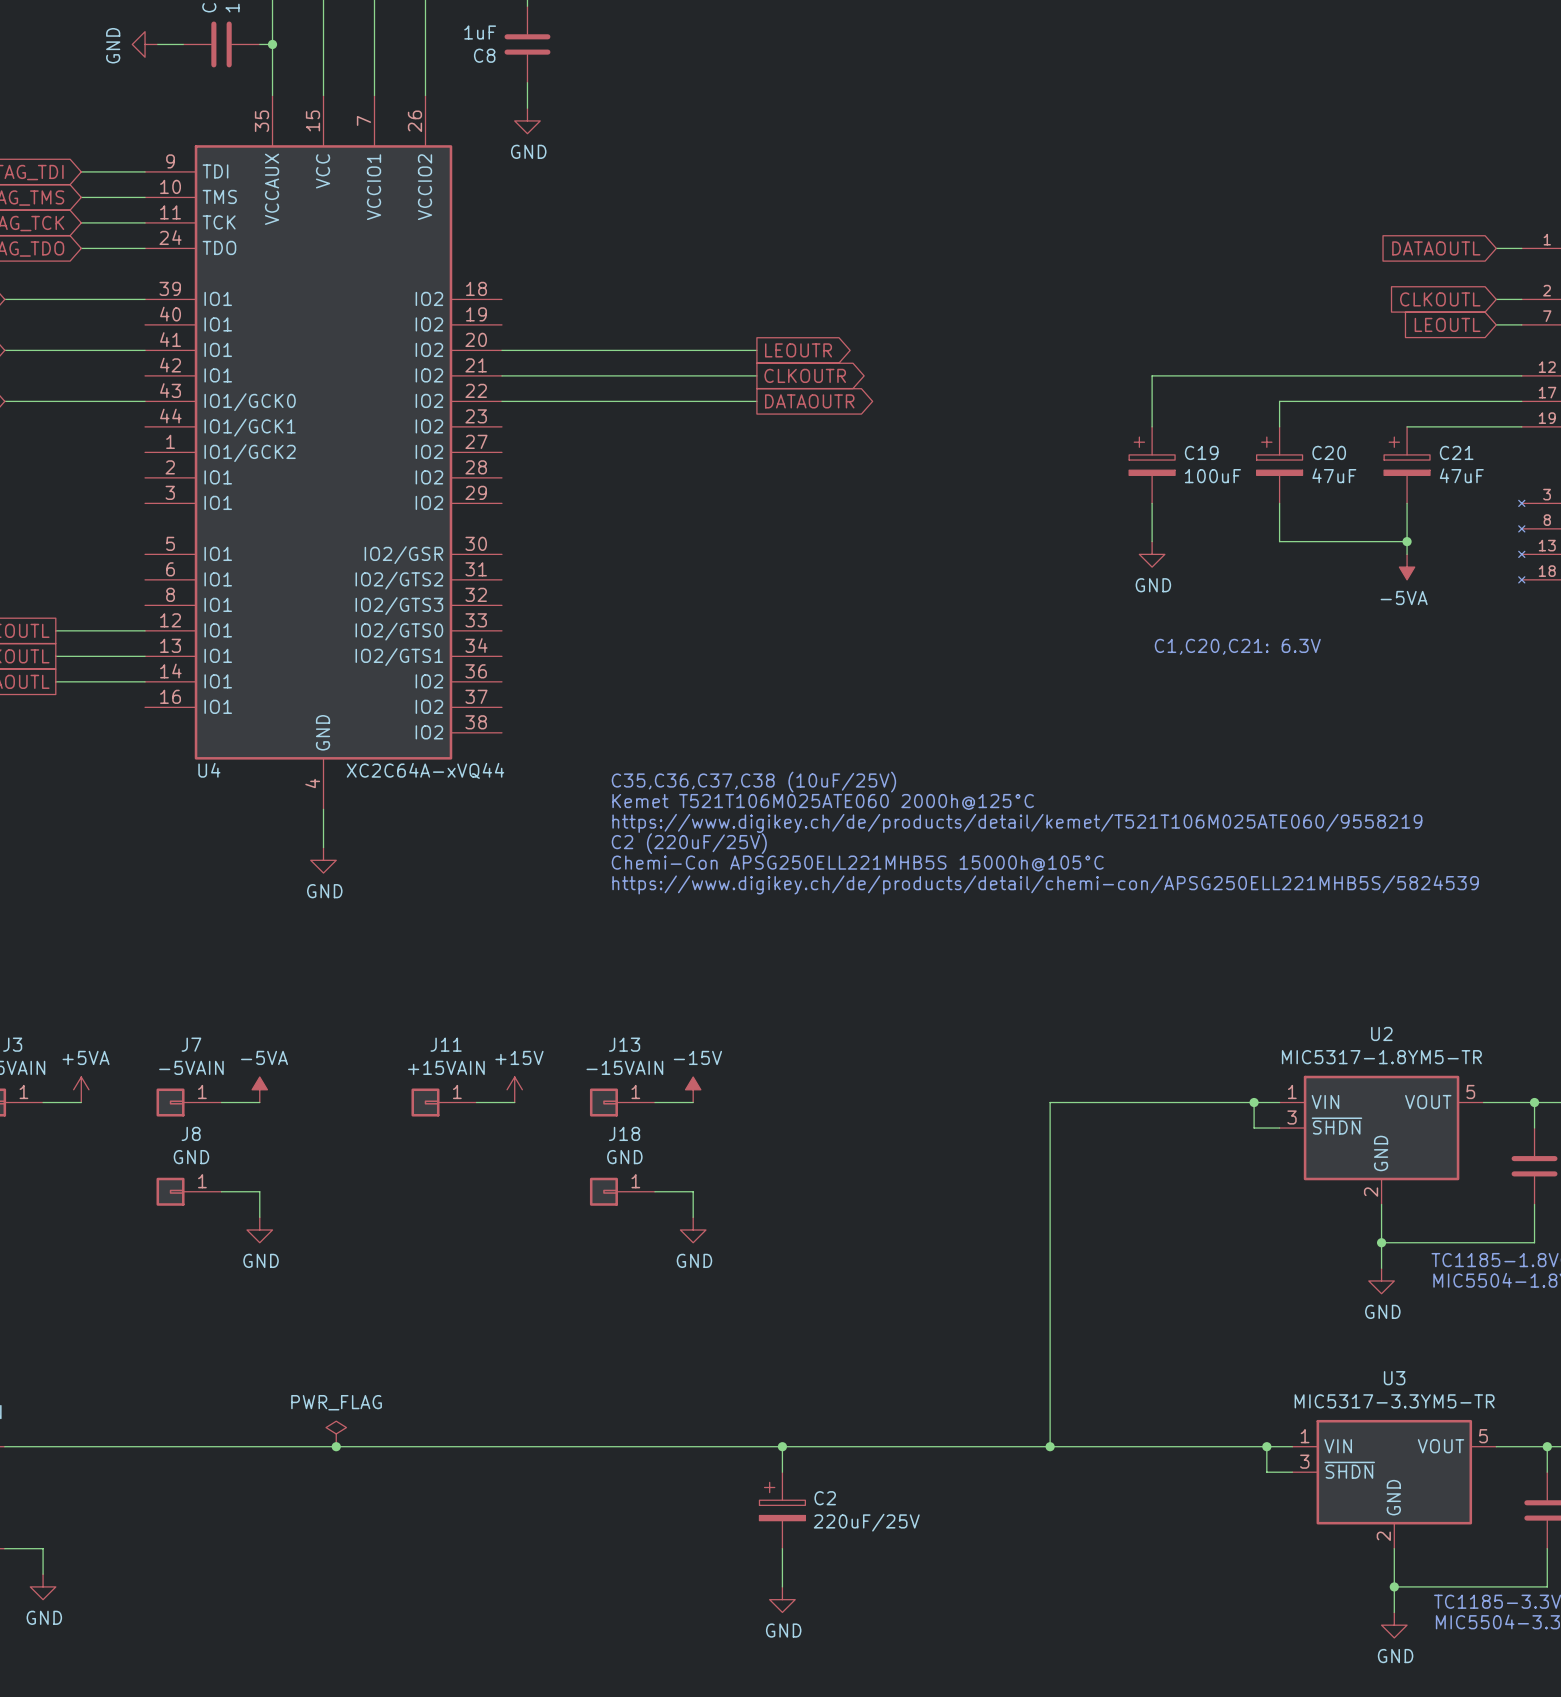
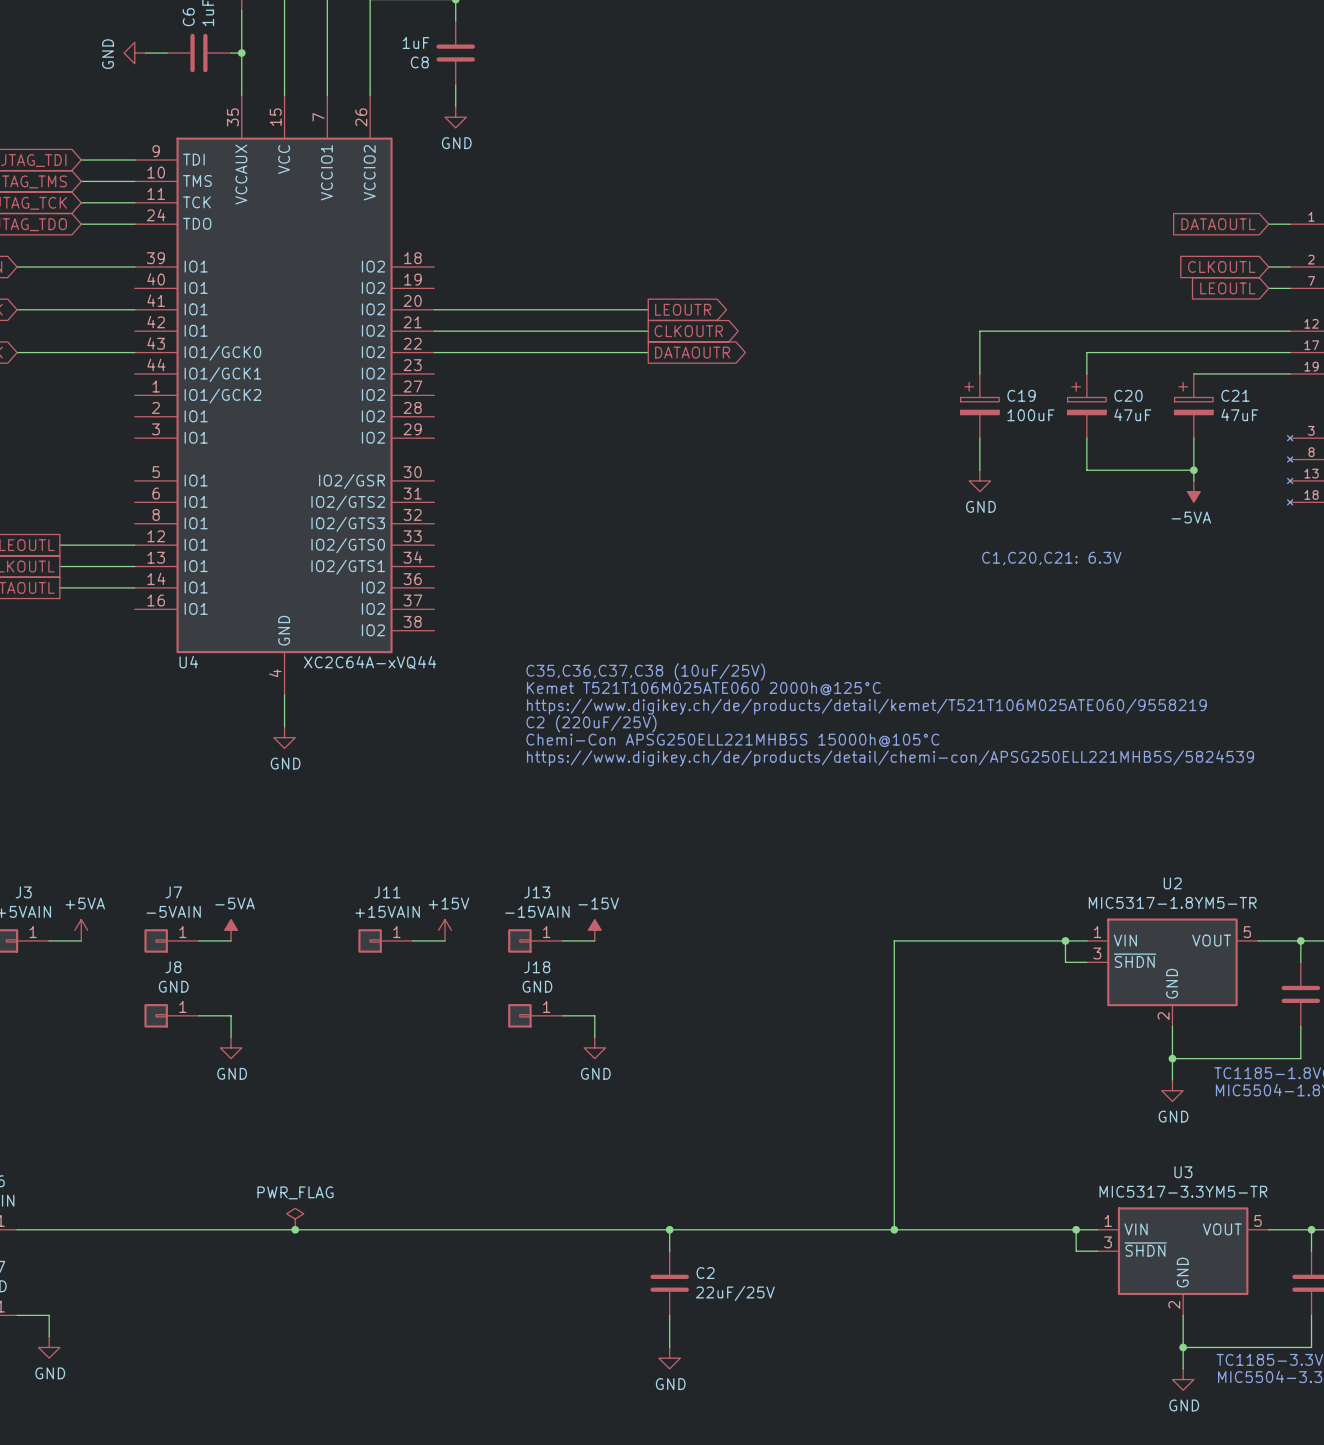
C2 symbol: [759, 1472, 806, 1549] -> [650, 1251, 689, 1316]
C2 value: 220uF/25V (866, 1522) -> 22uF/25V (735, 1293)

